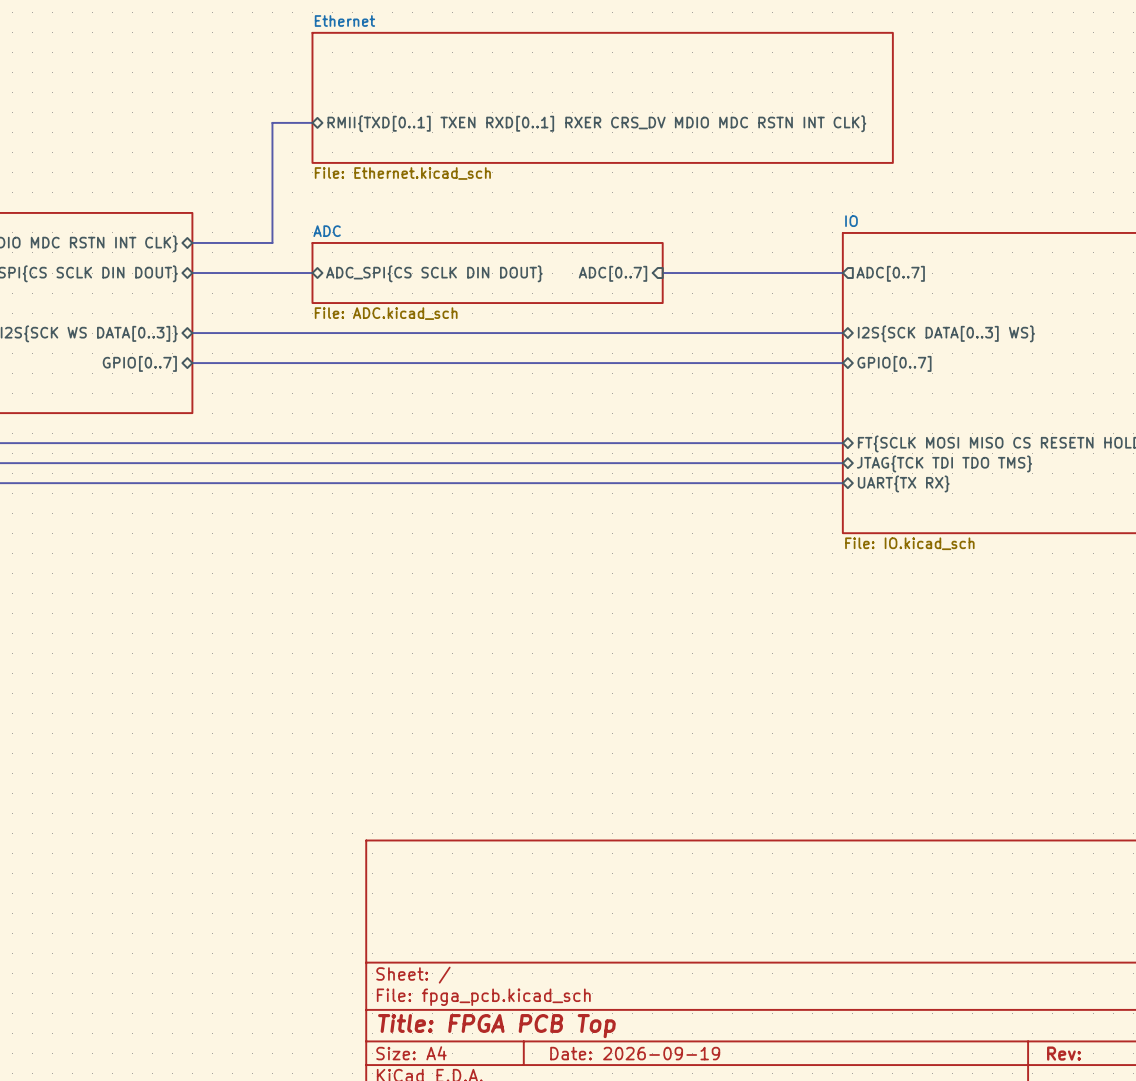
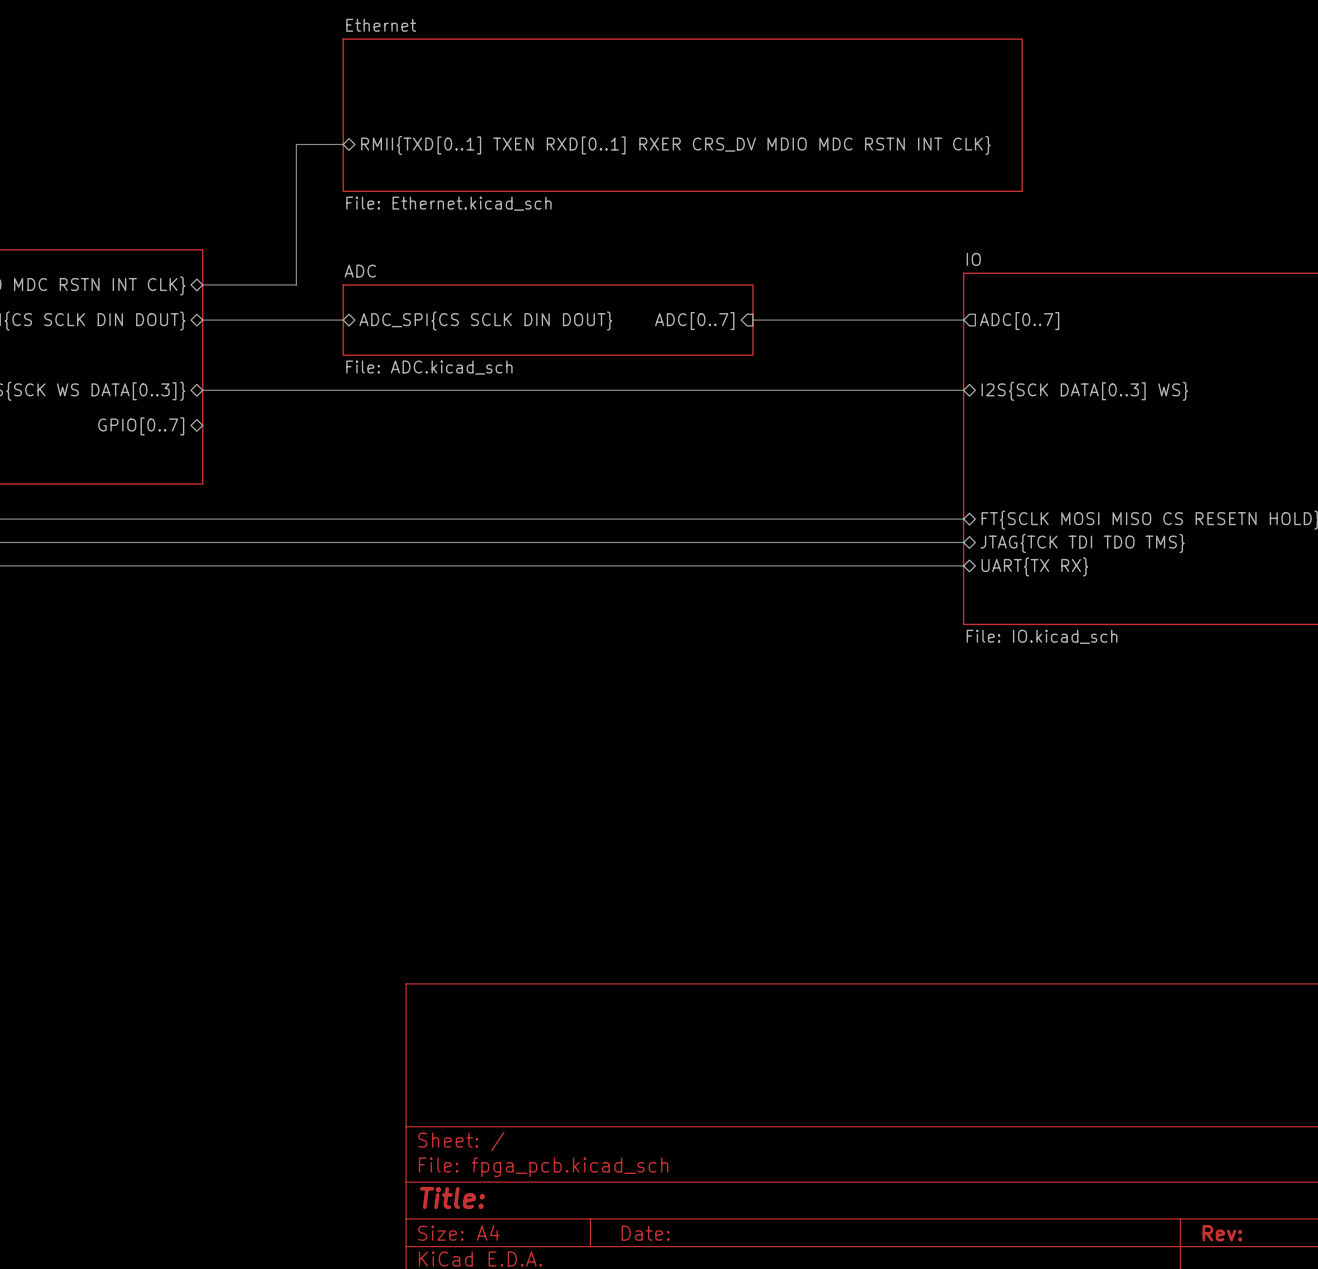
bus: (192, 363) (842, 363) -> none
sheet pin: GPIO[0..7] (894, 363) -> none
title block: Title: FPGA PCB Top (496, 1026) -> Title: (452, 1198)
title block: Date: 2026-09-19 (635, 1053) -> Date: (645, 1233)

